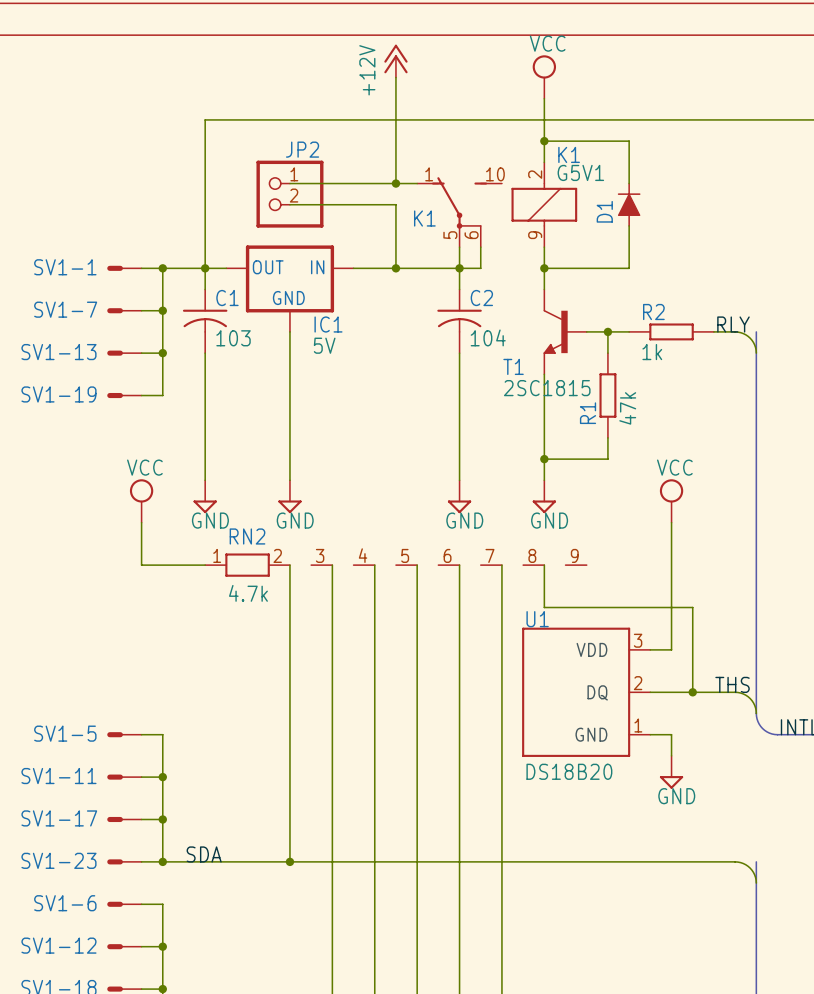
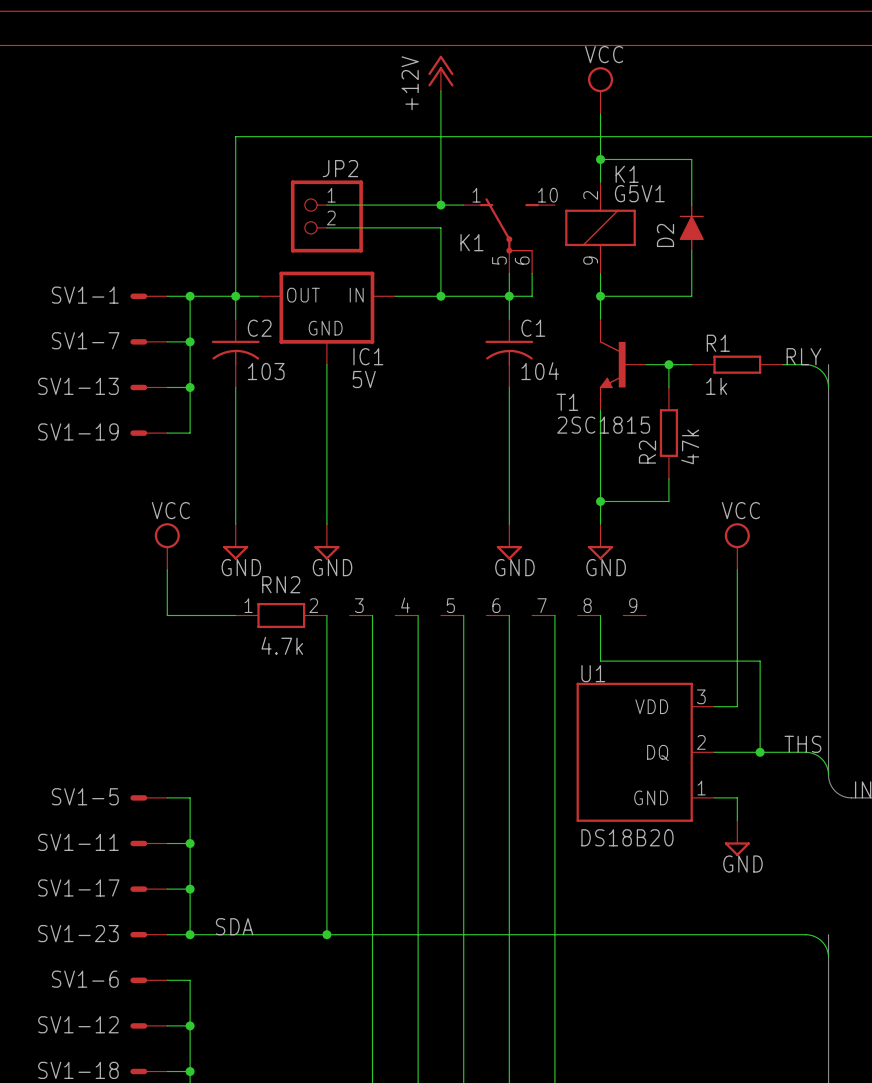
D1 name: D1 (604, 211) -> D2 (665, 235)
C1 name: C1 (227, 298) -> C2 (259, 328)
C2 name: C2 (481, 298) -> C1 (533, 328)
R2 name: R2 (653, 312) -> R1 (718, 343)
R1 name: R1 (588, 413) -> R2 (647, 452)

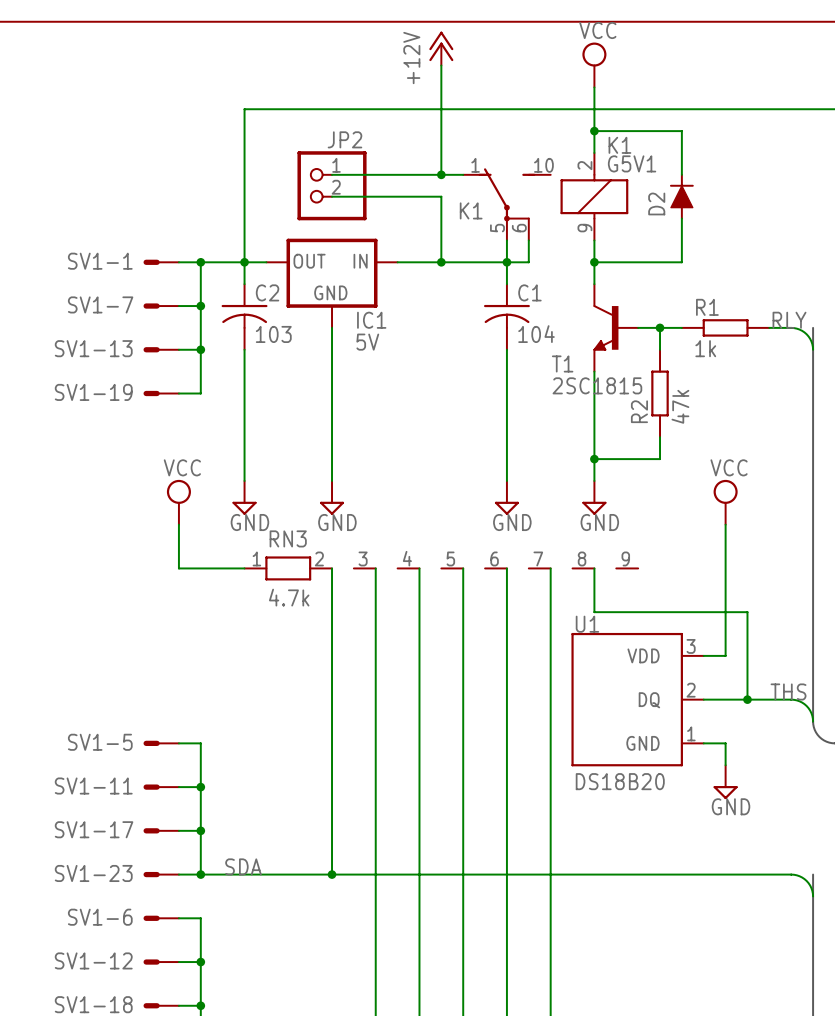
RN2 name: RN2 (281, 584) -> RN3 (288, 538)

